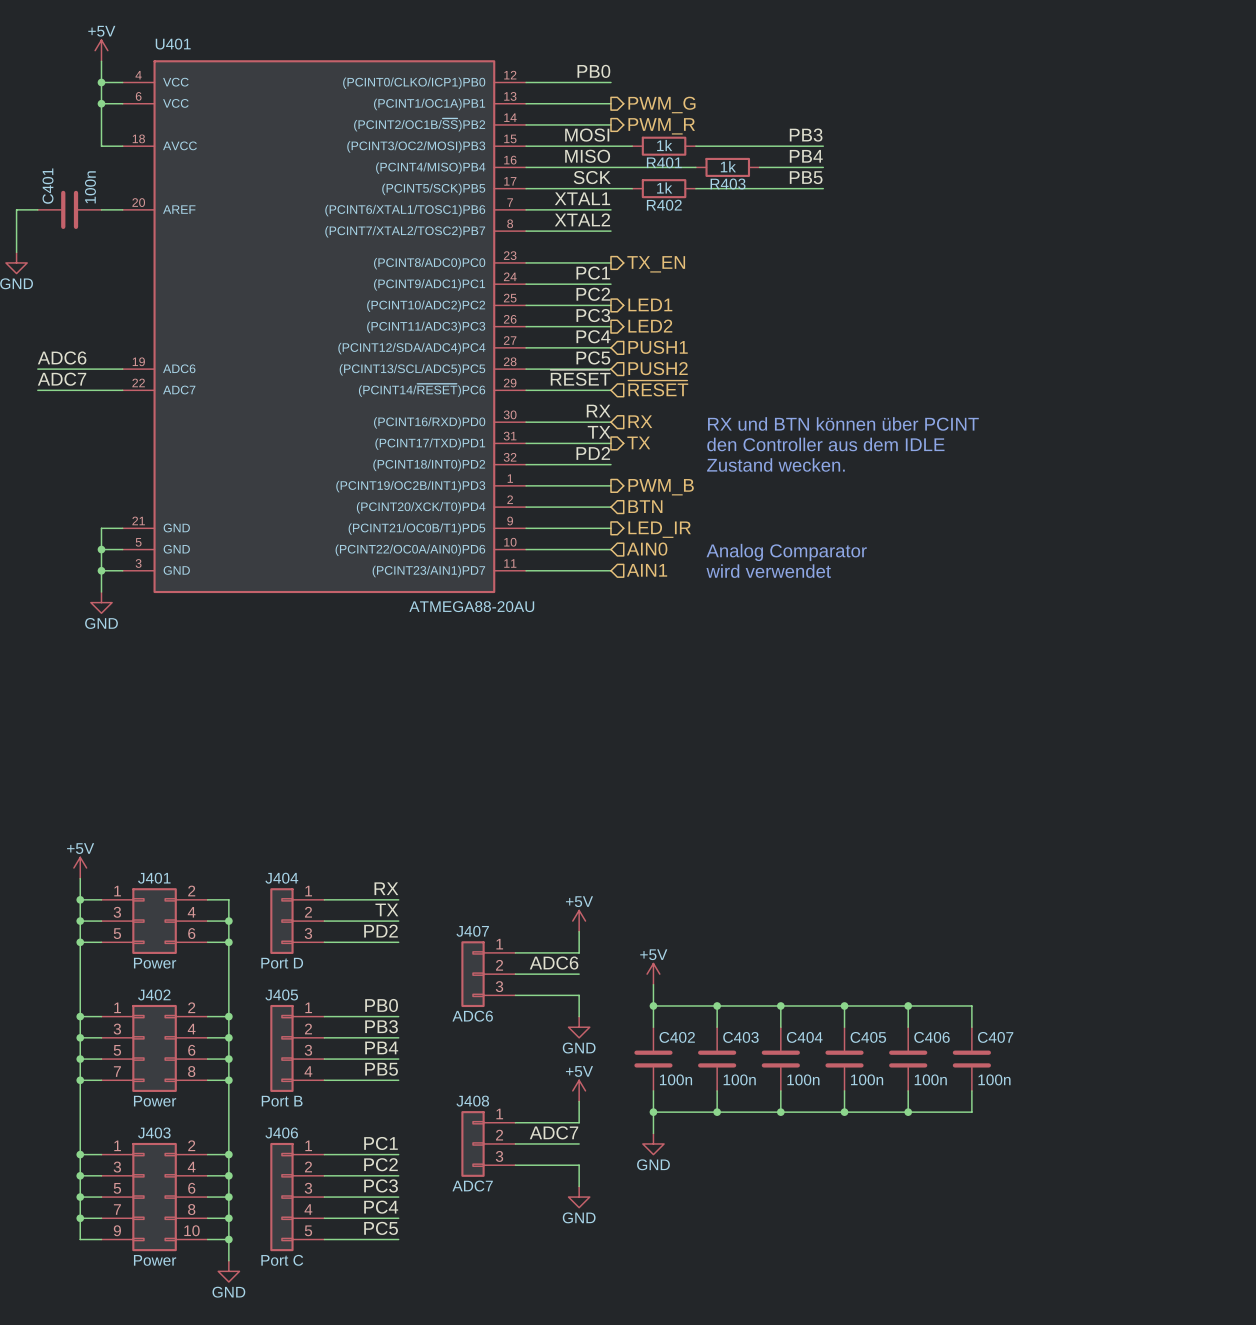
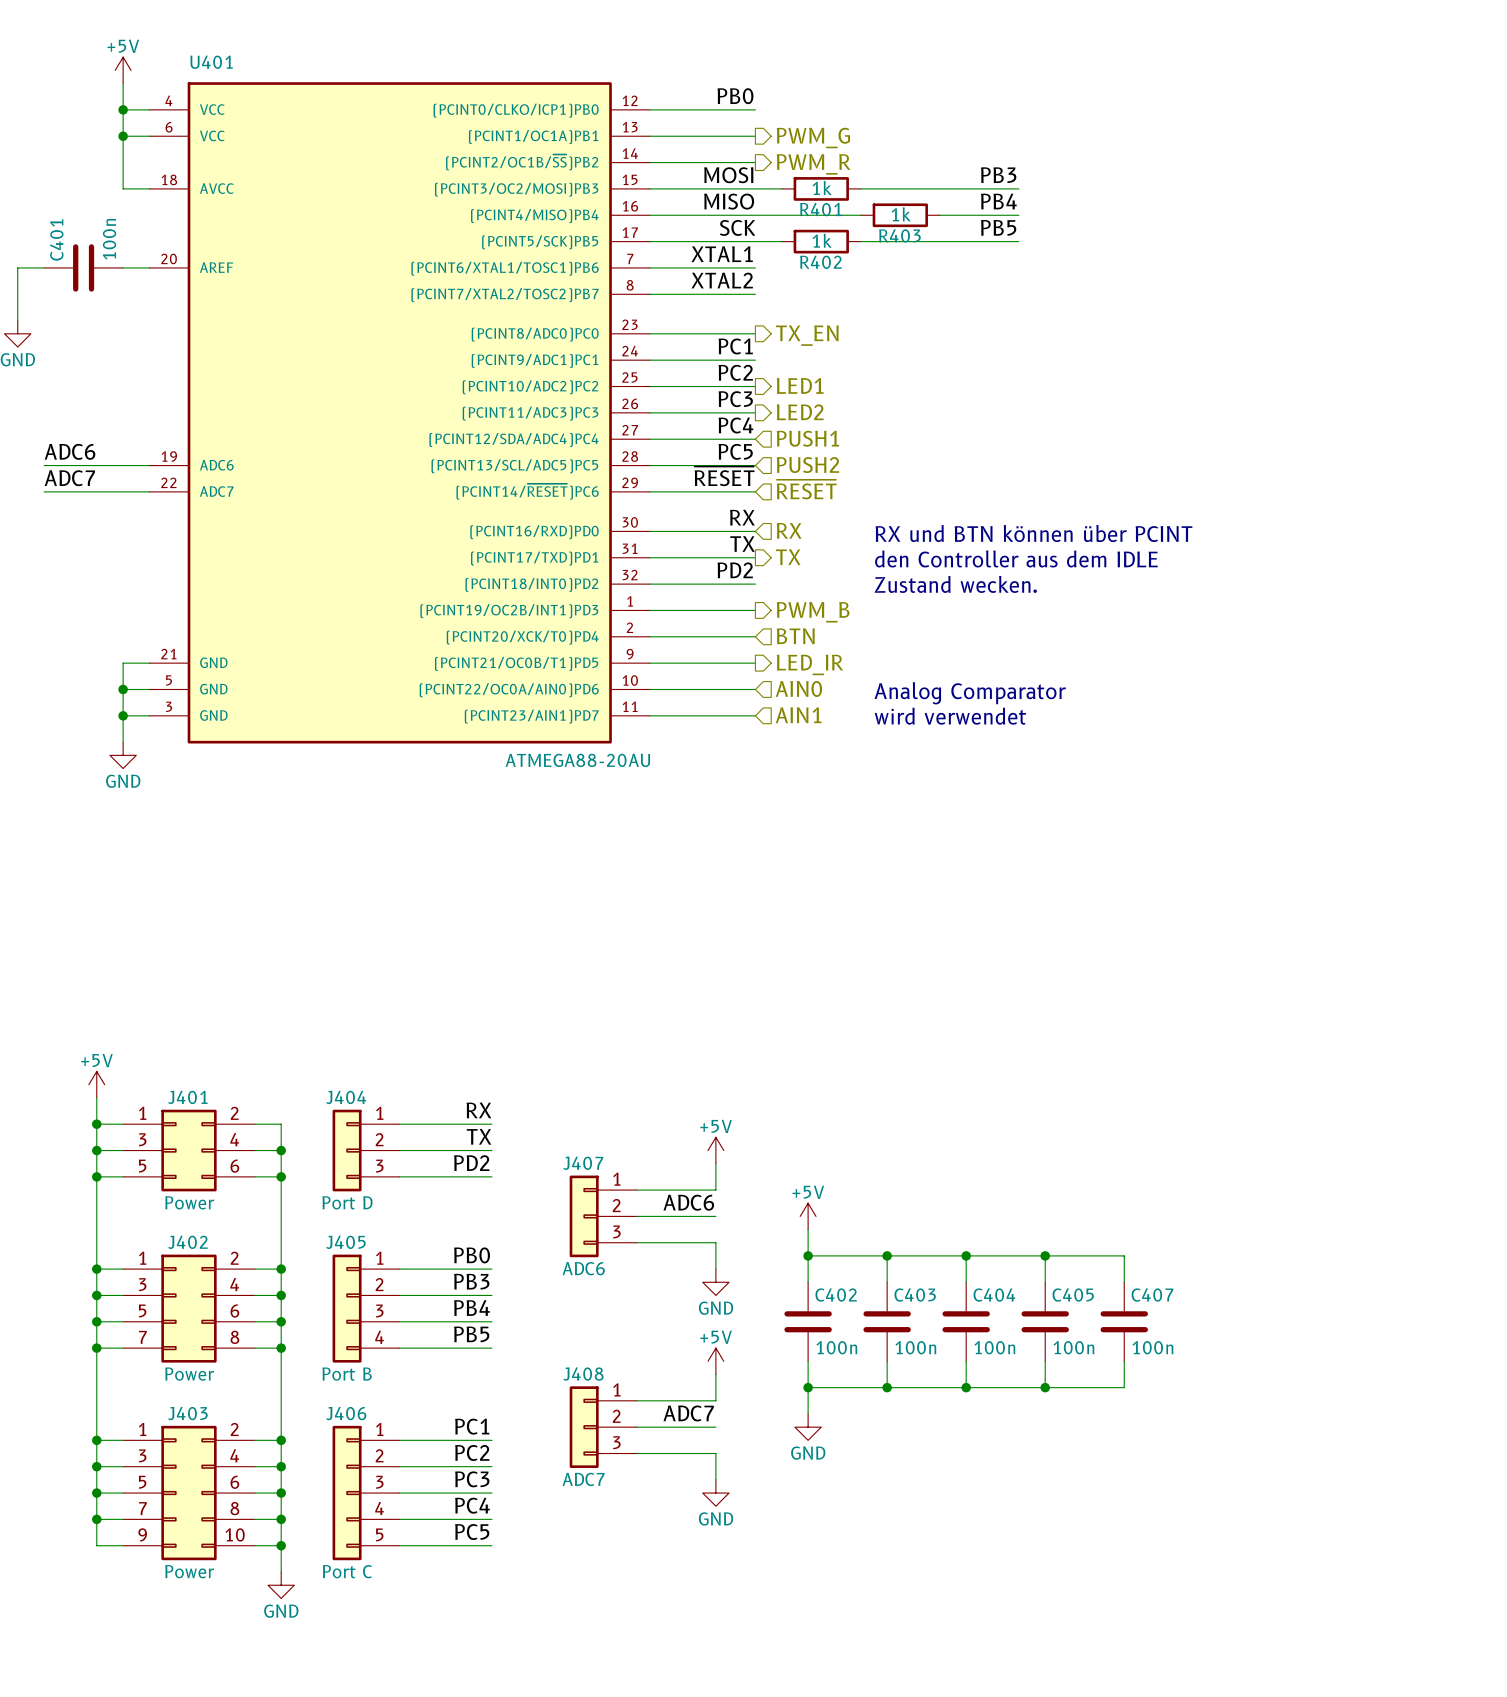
wire: (908, 1005) (971, 1005) (971, 1027) -> none
junction: (908, 1005) -> none
C406 name: C406 (932, 1037) -> C407 (1152, 1295)
C407: 100n (971, 1059) -> none
wire: (971, 1090) (971, 1112) (908, 1112) -> none
junction: (908, 1112) -> none

